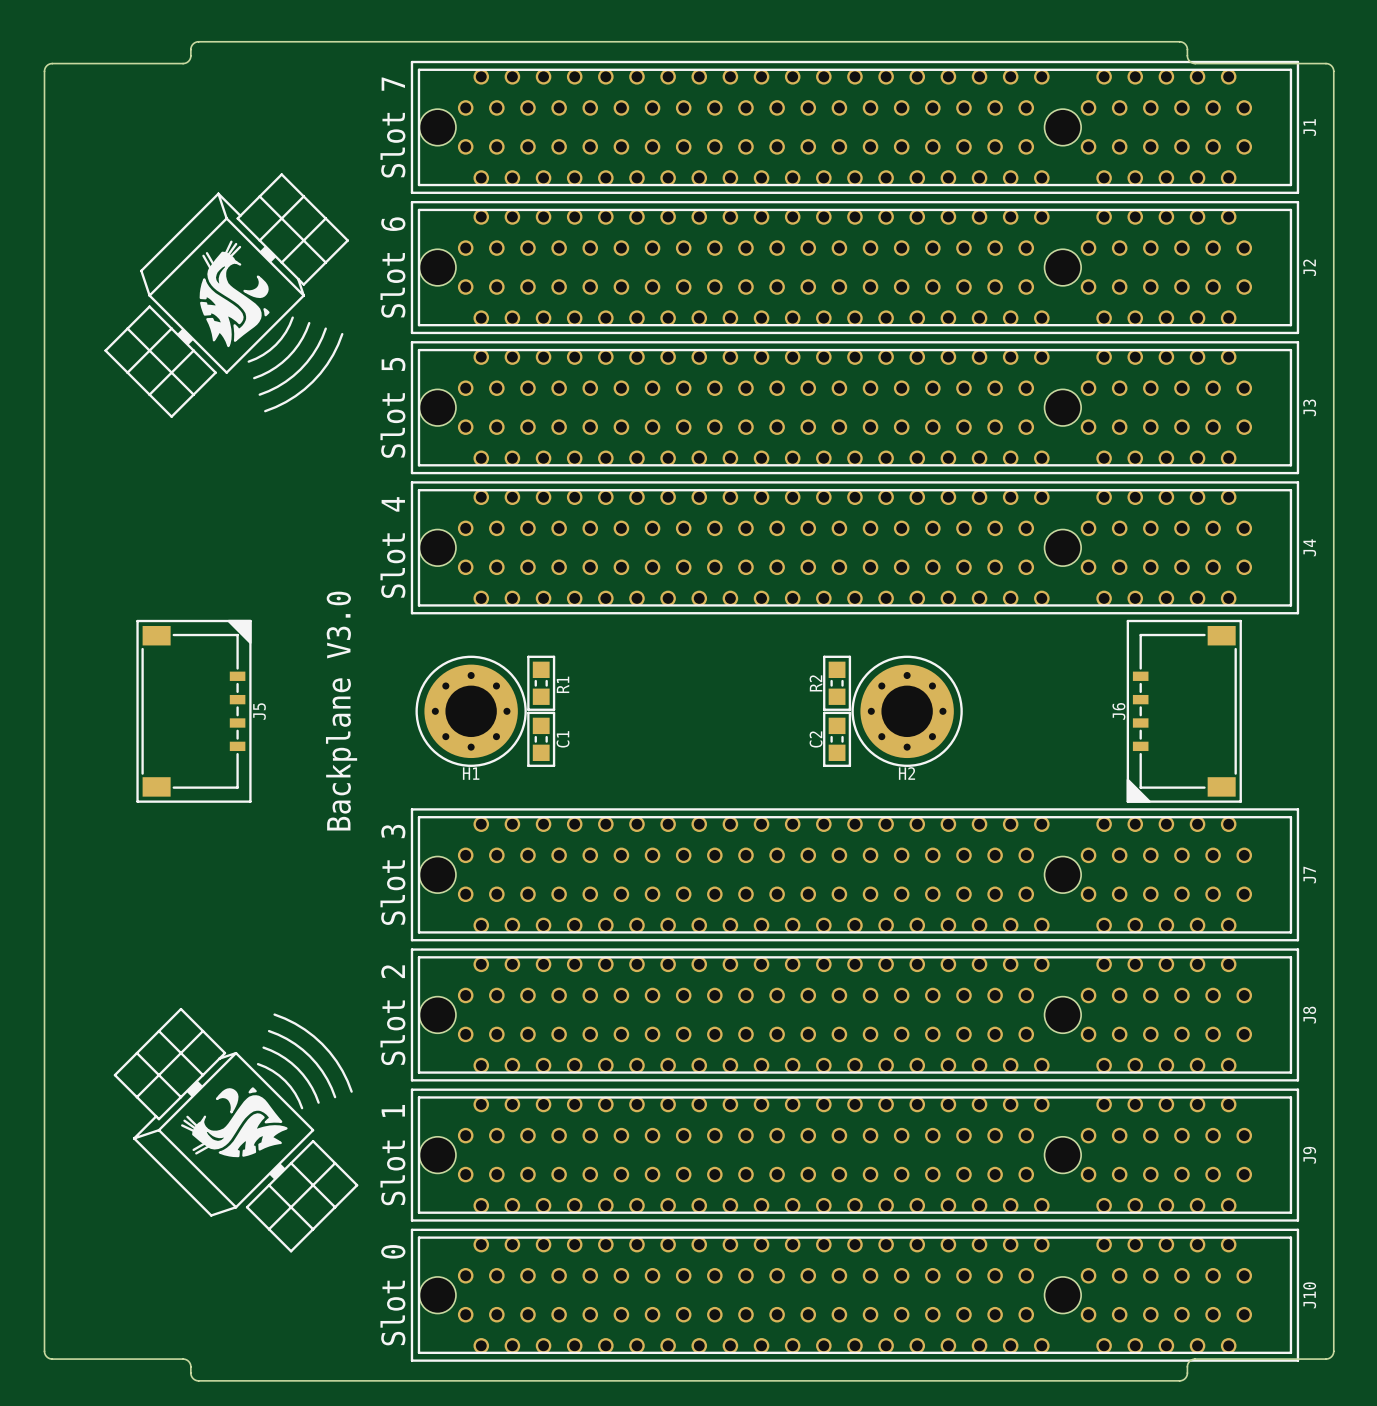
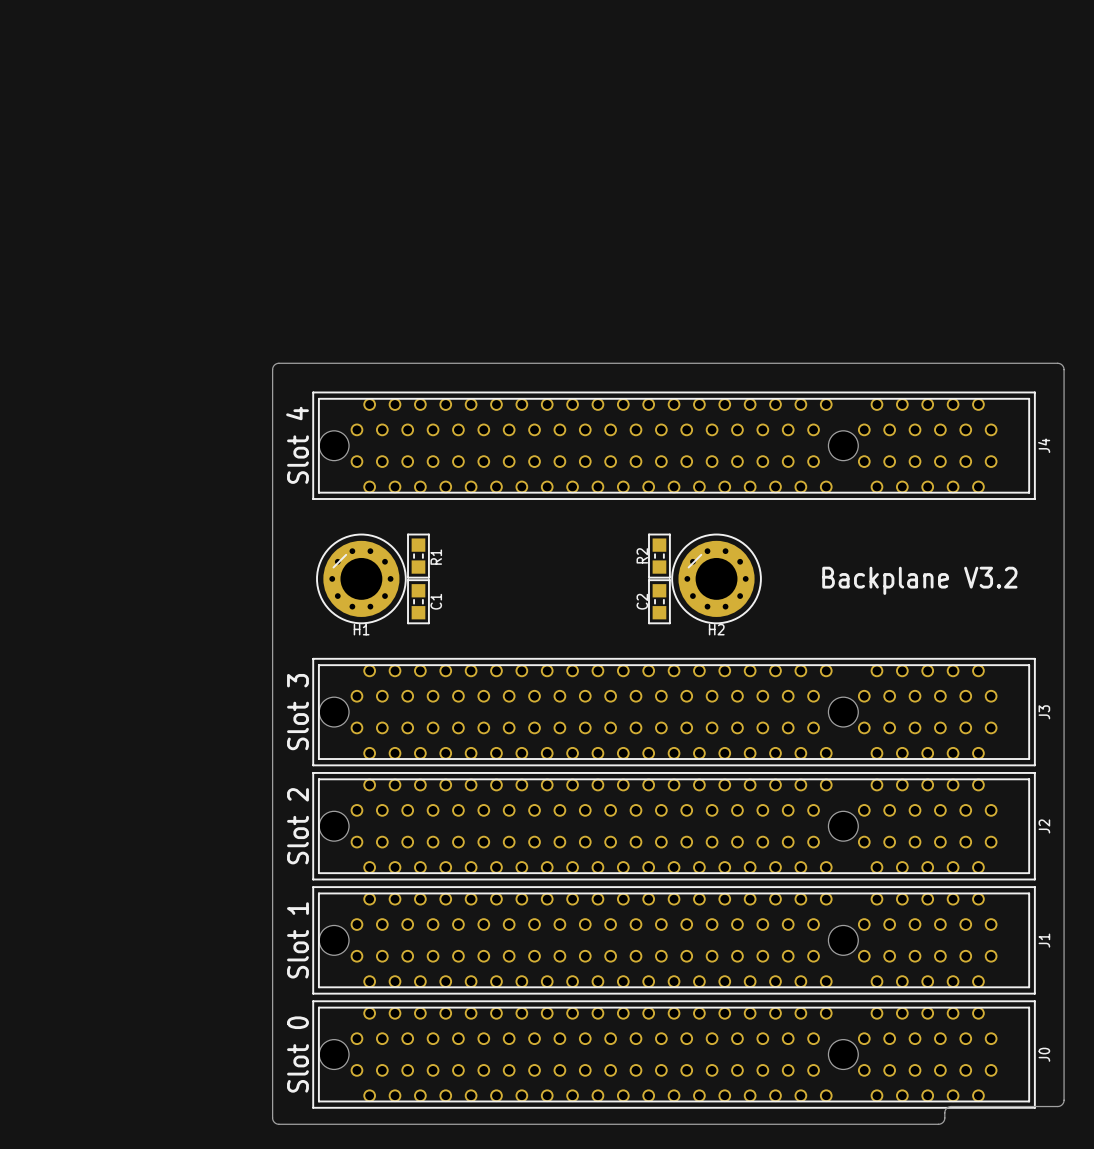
text: Slot 7 (392, 127) -> none
J1: (854, 127) -> none
drawing: [104, 173, 349, 418] -> none
text: Slot 6 (392, 267) -> none
J2: (854, 267) -> none
text: Slot 5 (392, 407) -> none
J3: (854, 407) -> none
board edge: (1333, 454) (1333, 71) (1332, 66) (1328, 63) (1194, 63) (1188, 58) (1185, 44) (1179, 41) (198, 41) (192, 44) (190, 58) (184, 63) (52, 63) (46, 65) (44, 71) (44, 1353) (47, 1357) (52, 1359) (184, 1359) (189, 1362) (191, 1376) (197, 1380) (369, 1380) -> (1064, 369) (1062, 365) (1057, 363) (278, 363) (274, 365) (272, 369) (272, 1117) (274, 1122) (278, 1124)
H1 footprint: [415, 655, 527, 767] -> [316, 533, 407, 625]
H2 footprint: [851, 655, 963, 767] -> [671, 533, 762, 625]
J5: (193, 711) -> none
text: Backplane V3.0 (341, 711) -> none
J6: (1184, 711) -> none
text: none -> Backplane V3.2 (919, 580)
J7 name: J7 (1309, 874) -> J3 (1044, 712)
drawing: [113, 1007, 359, 1253] -> none
J8 name: J8 (1309, 1015) -> J2 (1044, 826)
J9 name: J9 (1309, 1155) -> J1 (1044, 940)
J10 name: J10 (1309, 1295) -> J0 (1044, 1054)

